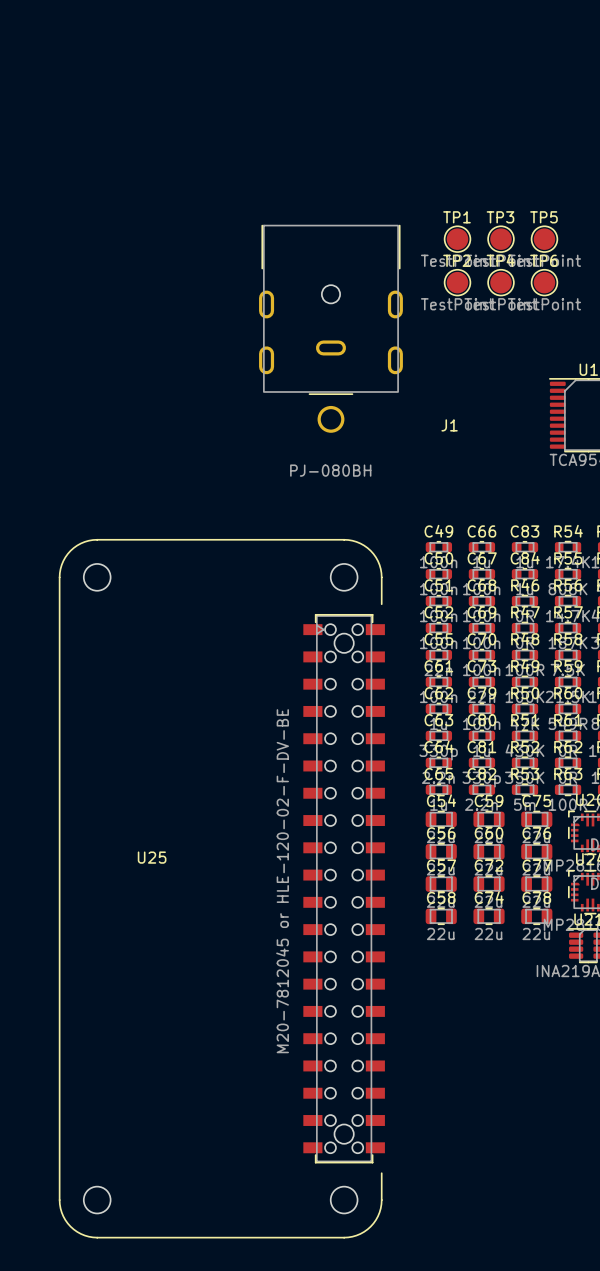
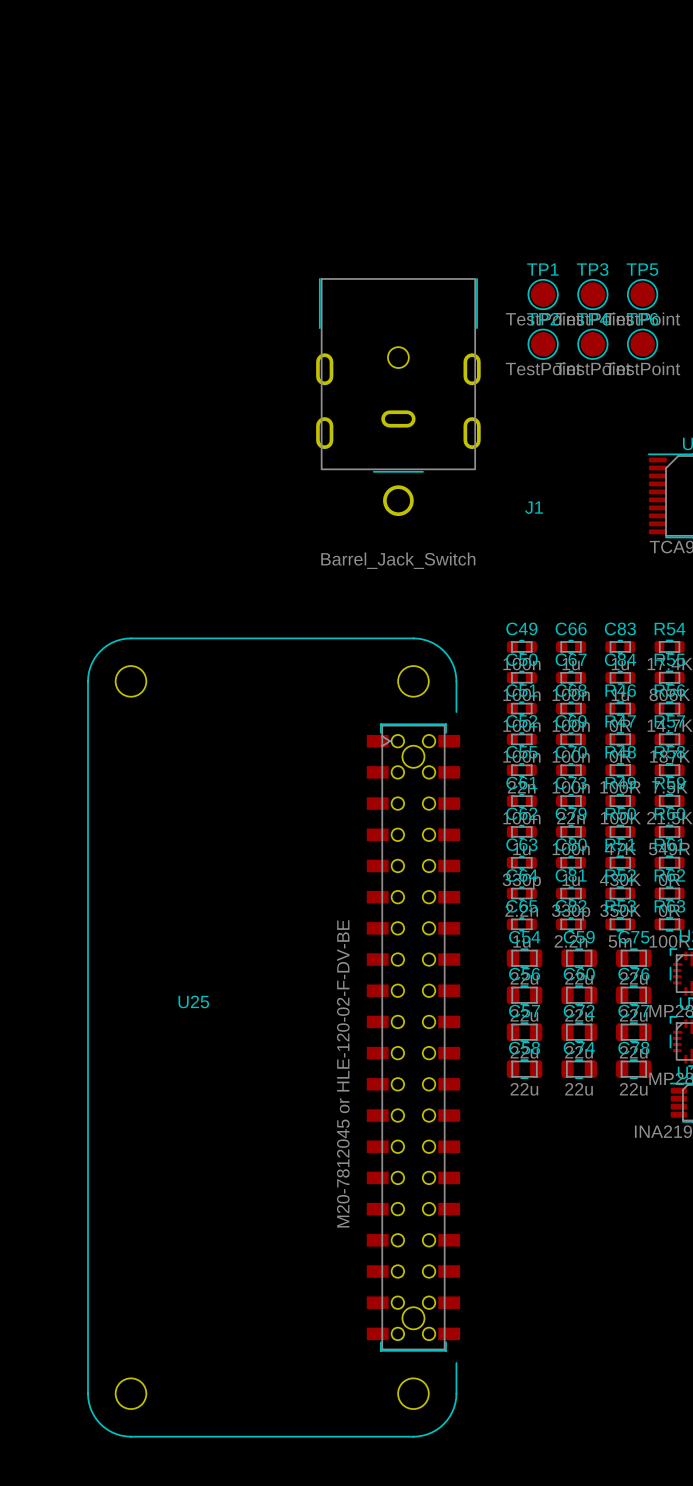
J1 value: PJ-080BH (330, 470) -> Barrel_Jack_Switch (398, 560)

